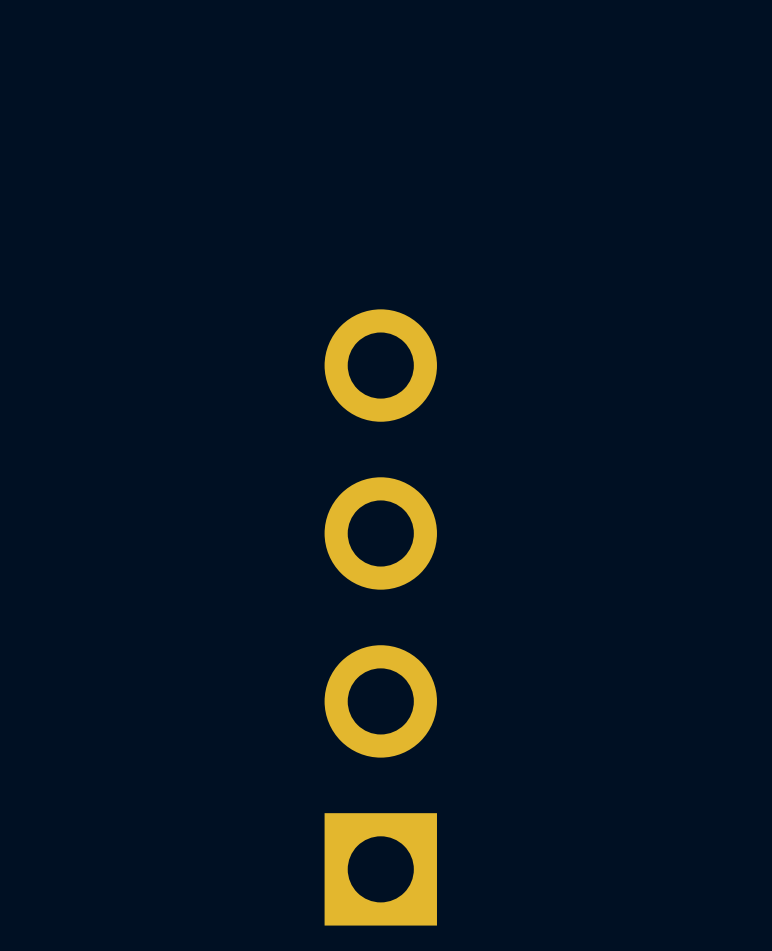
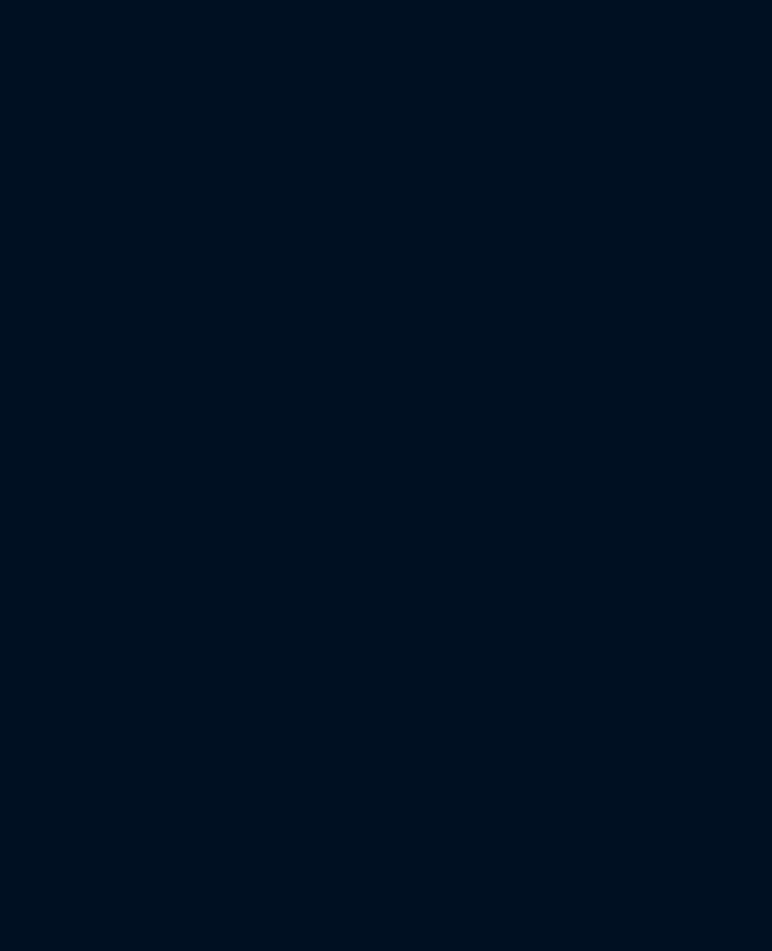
part: (380, 617) -> none

